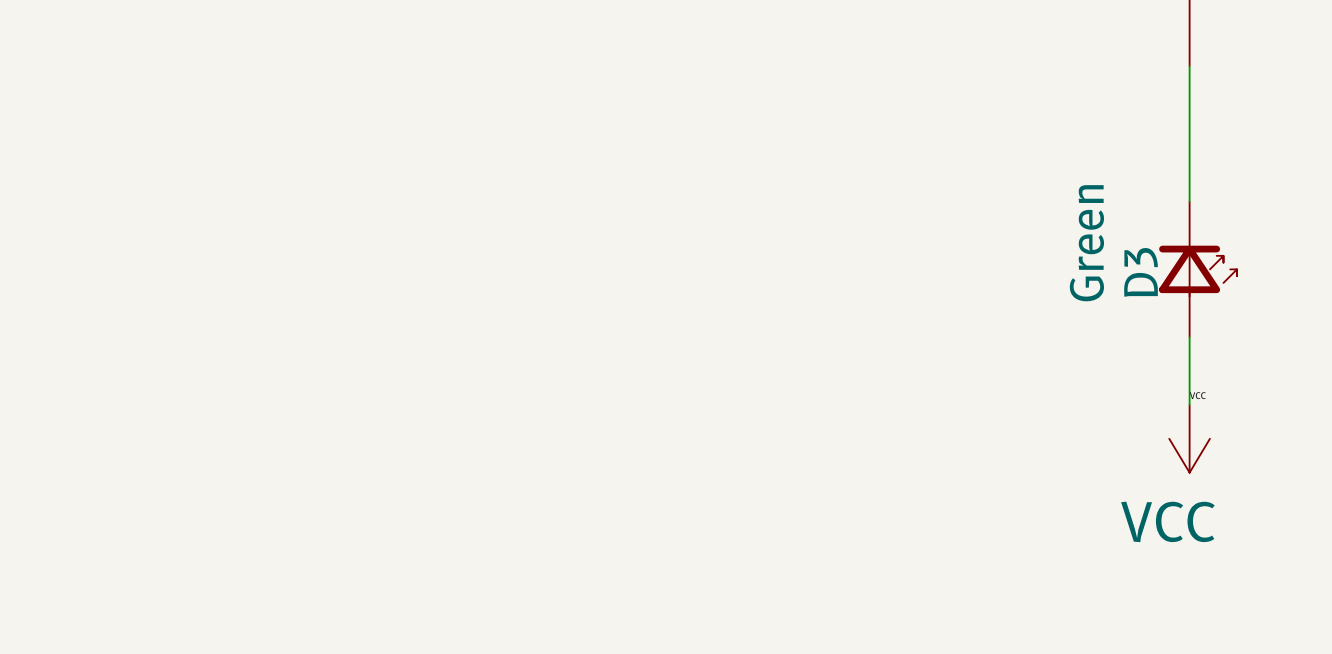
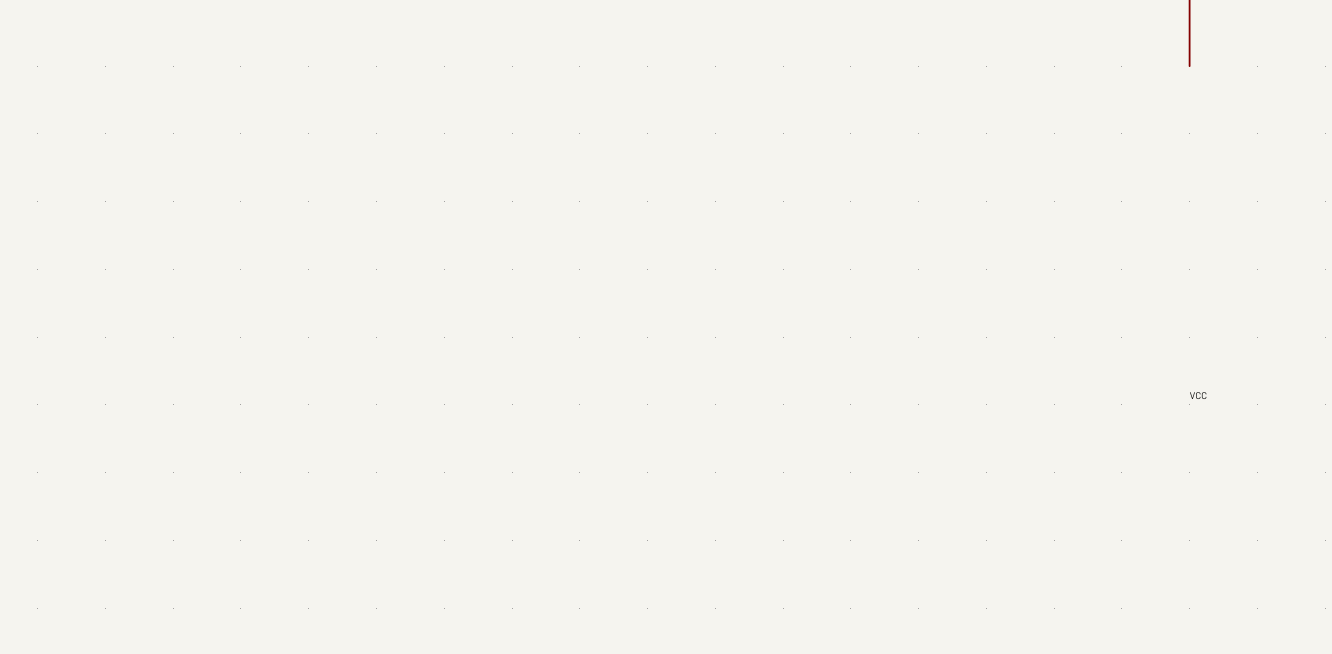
wire: (1189, 66) (1189, 201) -> none
D3: Green (1198, 269) -> none
wire: (1189, 337) (1189, 404) -> none
power symbol: VCC (1189, 438) -> none

